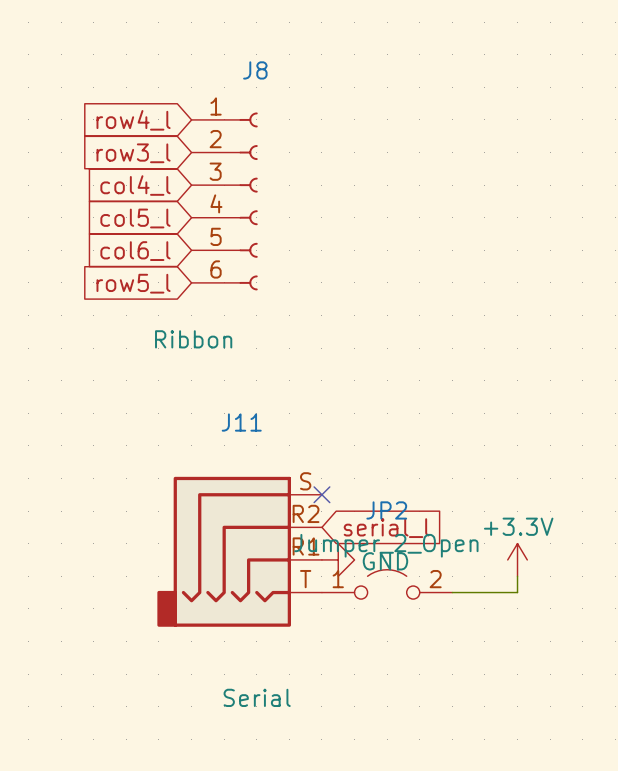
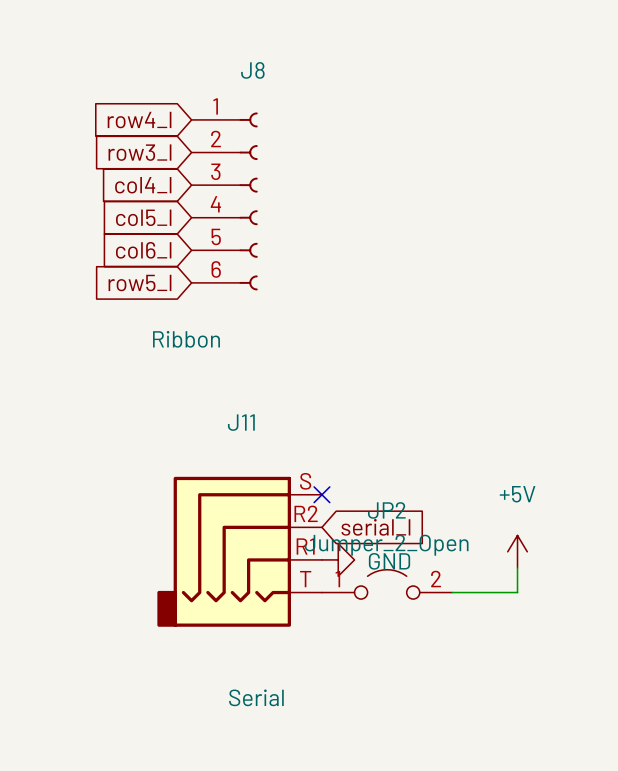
power symbol: +3.3V (517, 559) -> +5V (517, 551)

